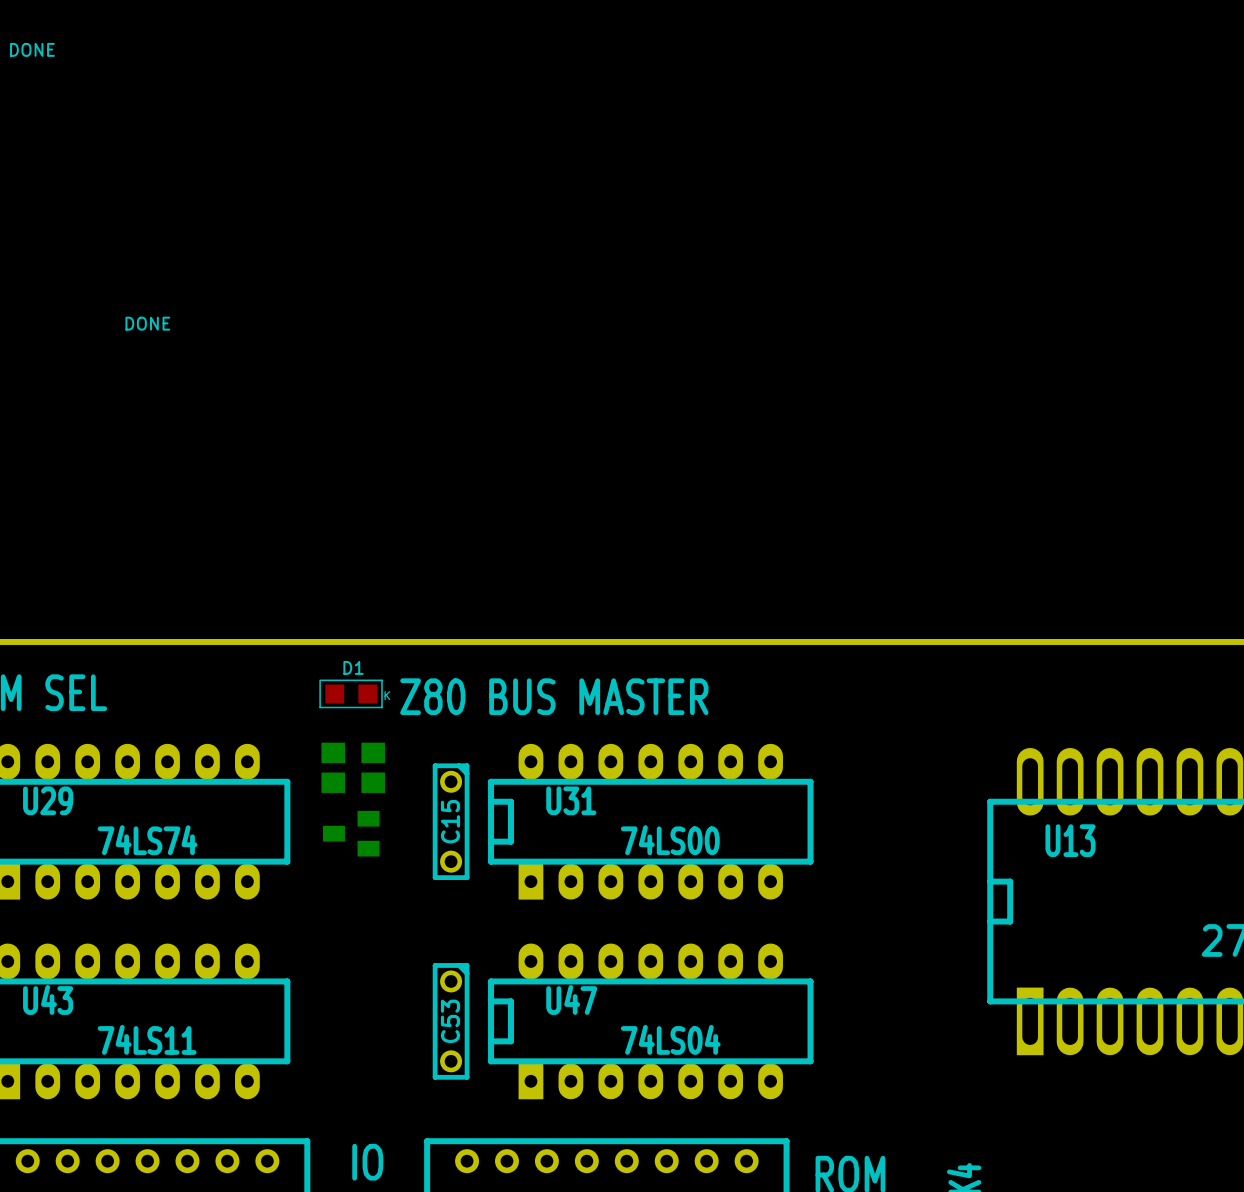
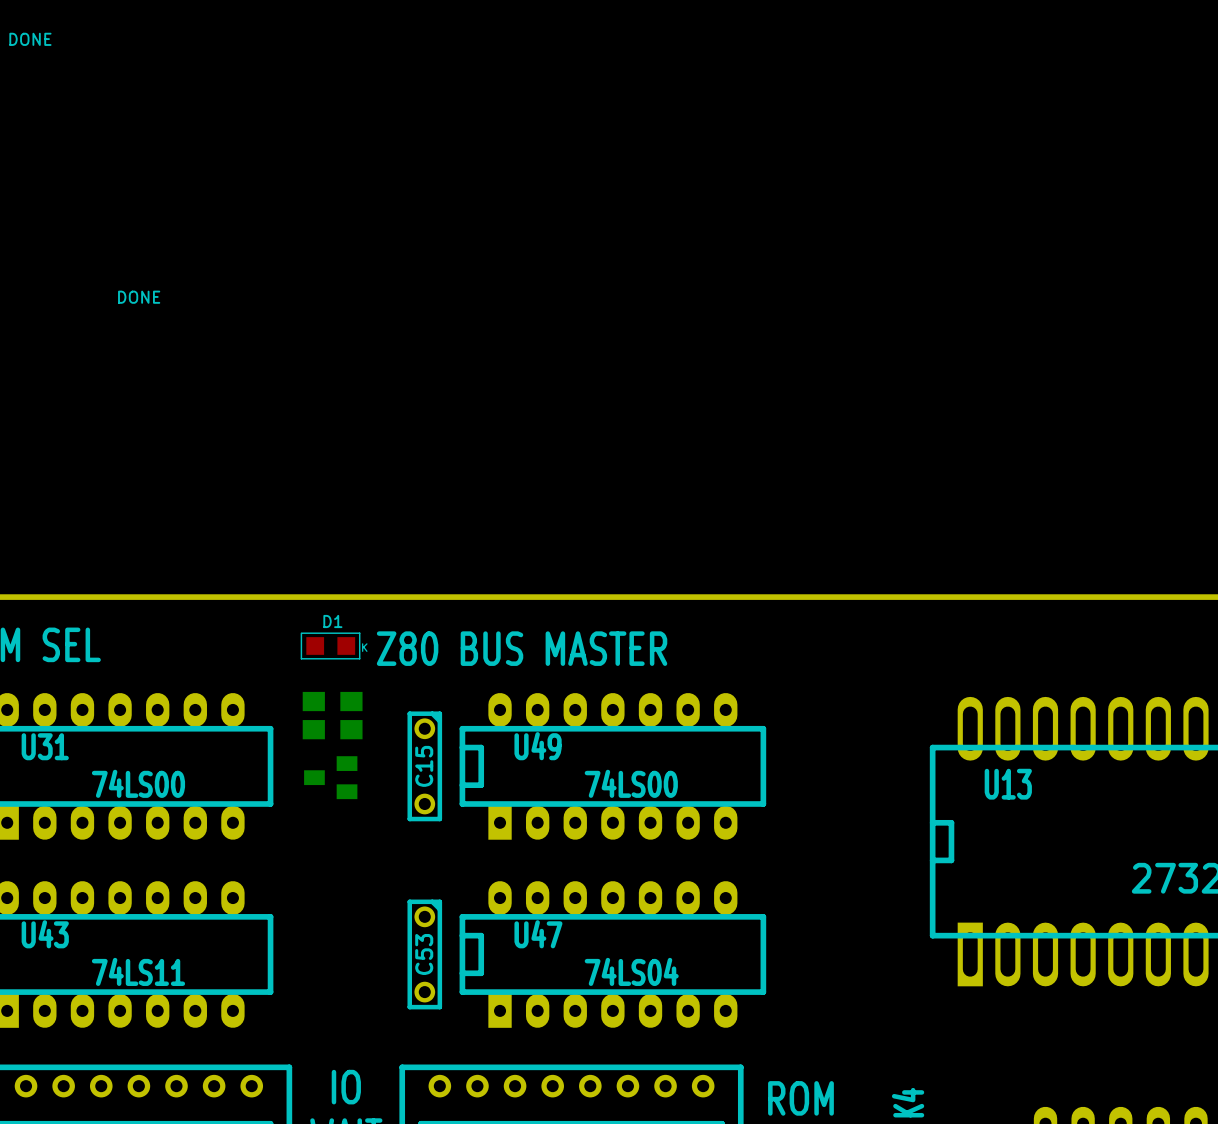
U29 name: U29 (48, 800) -> U31 (45, 746)
U31 name: U31 (571, 800) -> U49 (538, 746)
U29 value: 74LS74 (147, 840) -> 74LS00 (138, 783)

